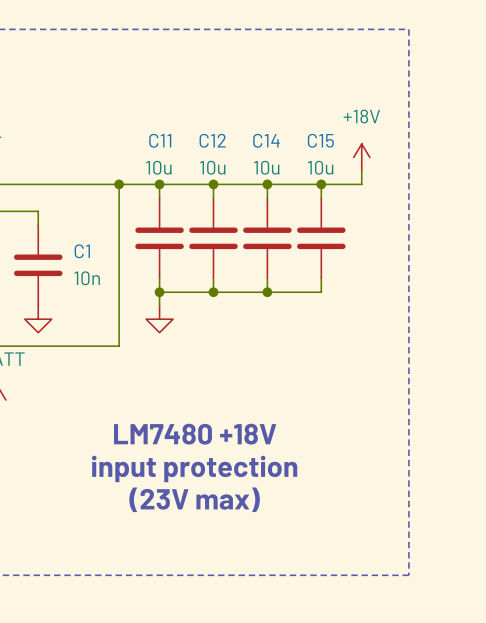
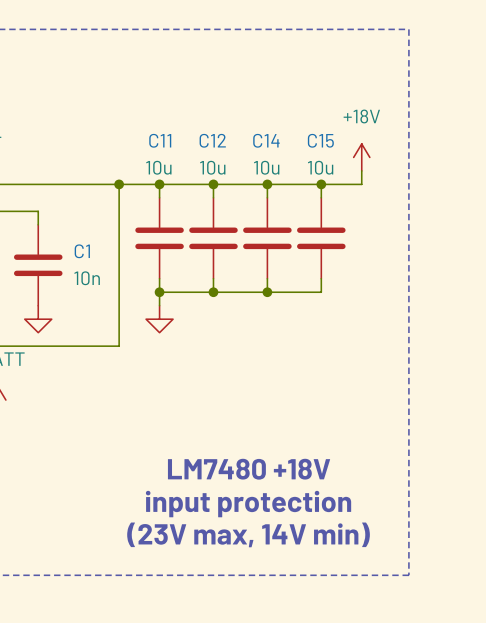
text position: LM7480 +18V (195, 434) -> LM7480 +18V (249, 469)
text position: input protection (194, 469) -> input protection (248, 504)
text: (23V max) (194, 499) -> (23V max, 14V min) (248, 534)

